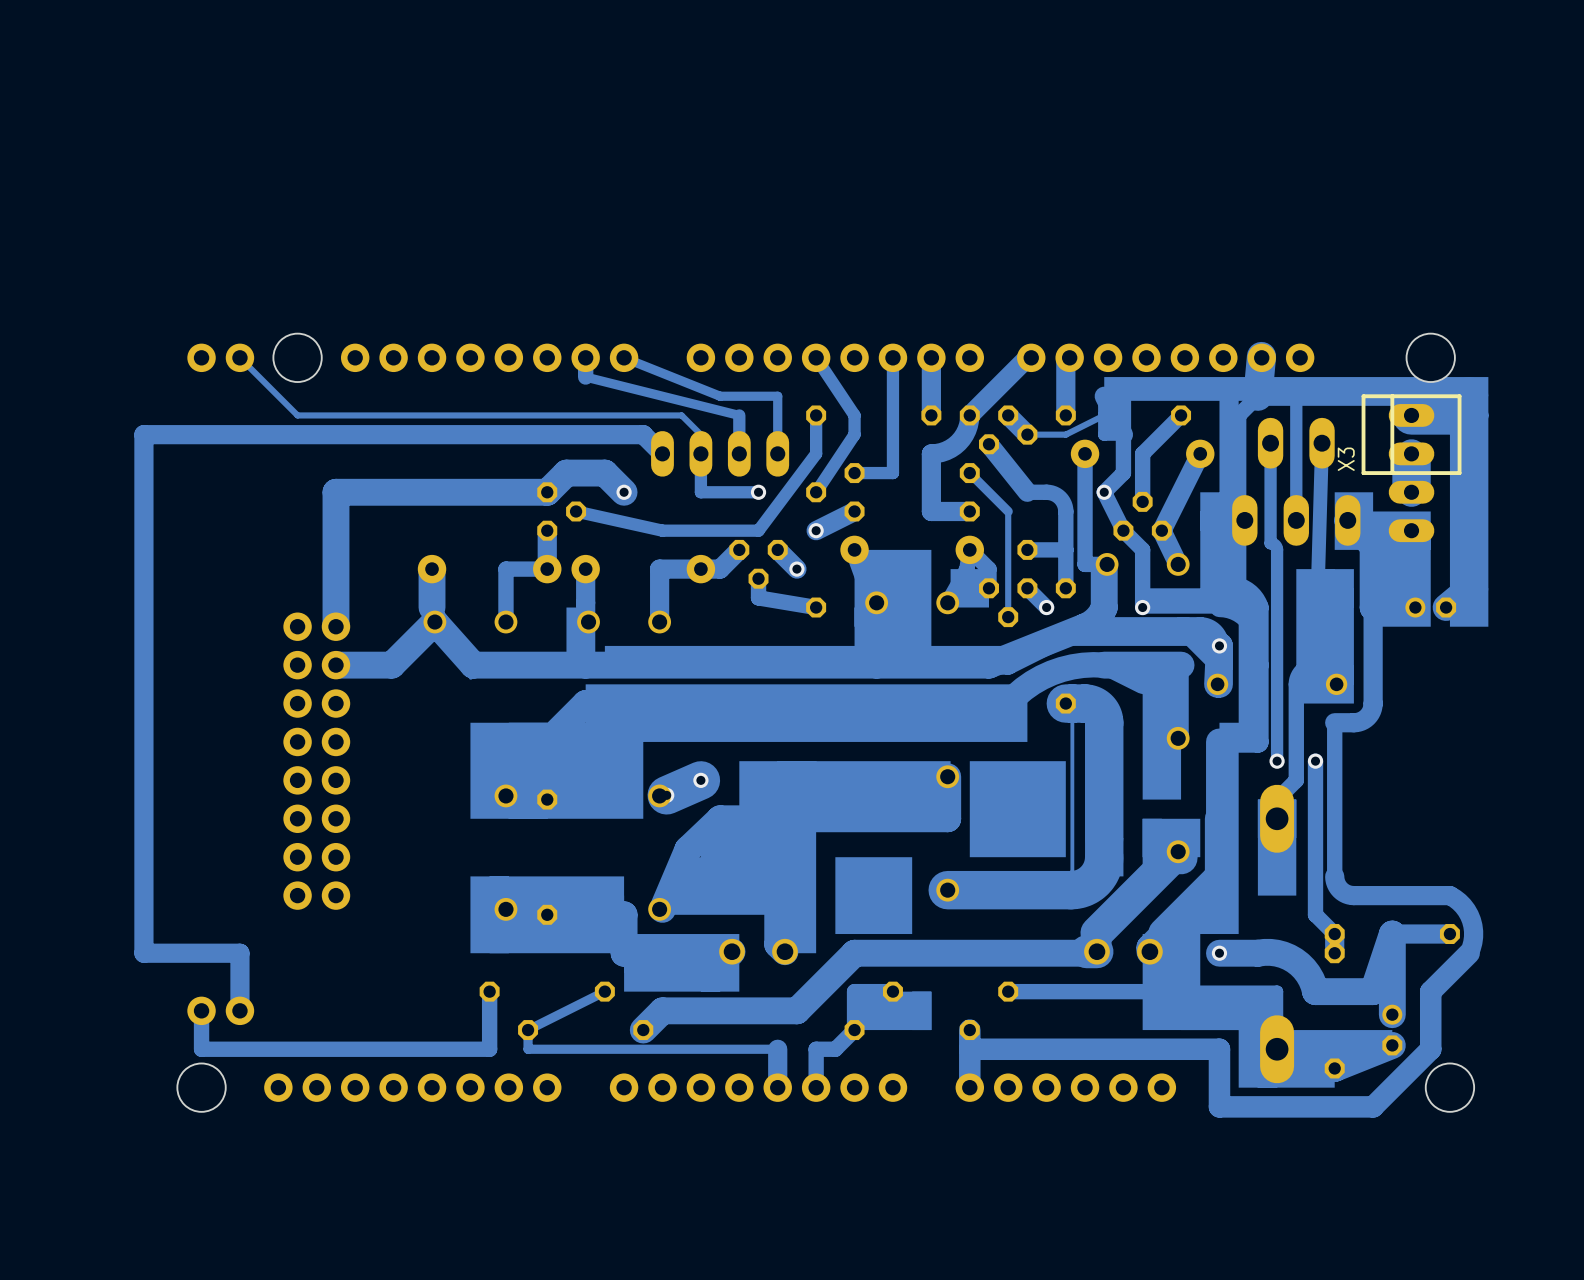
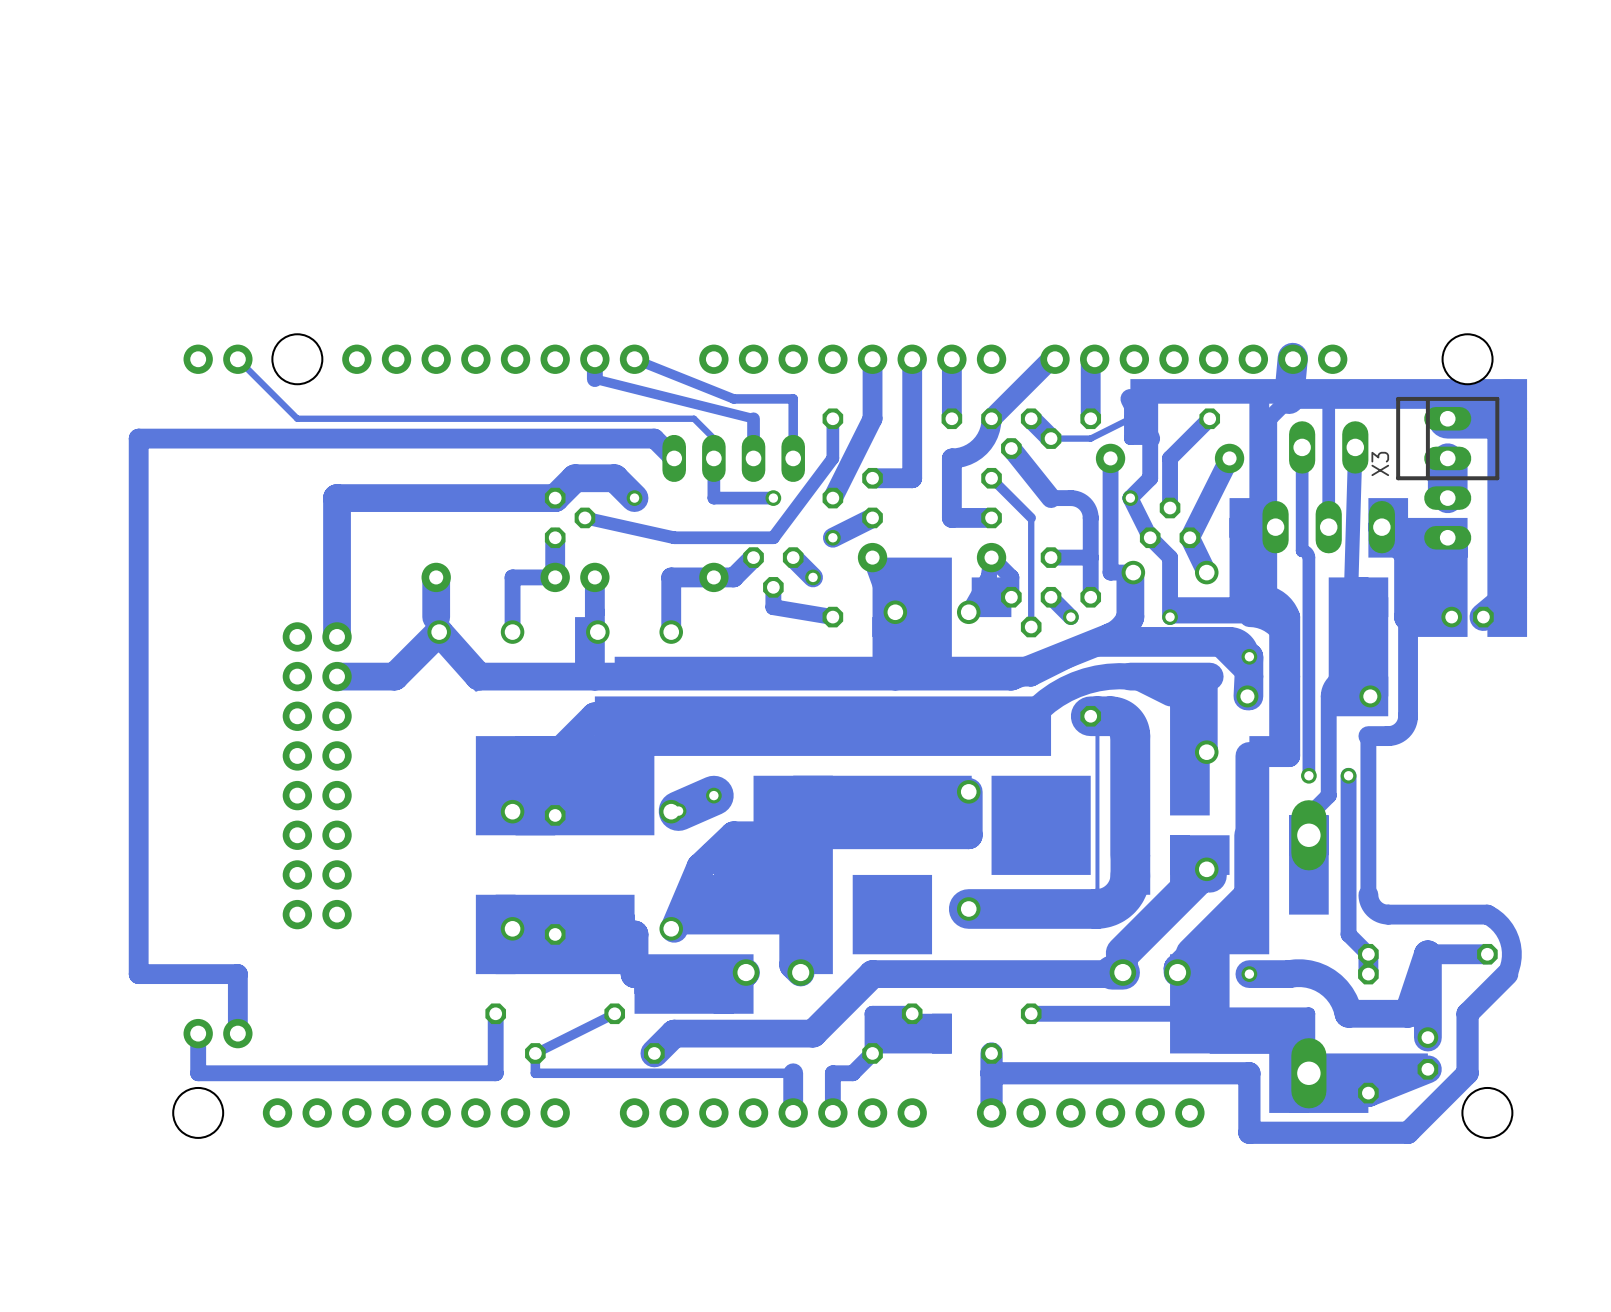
track: (816, 357) (854, 415) (854, 434) (816, 492) -> (872, 359) (872, 418) (832, 498)
track width: thin (892, 357) (892, 473) (854, 473) -> thick (912, 359) (912, 478) (872, 478)

